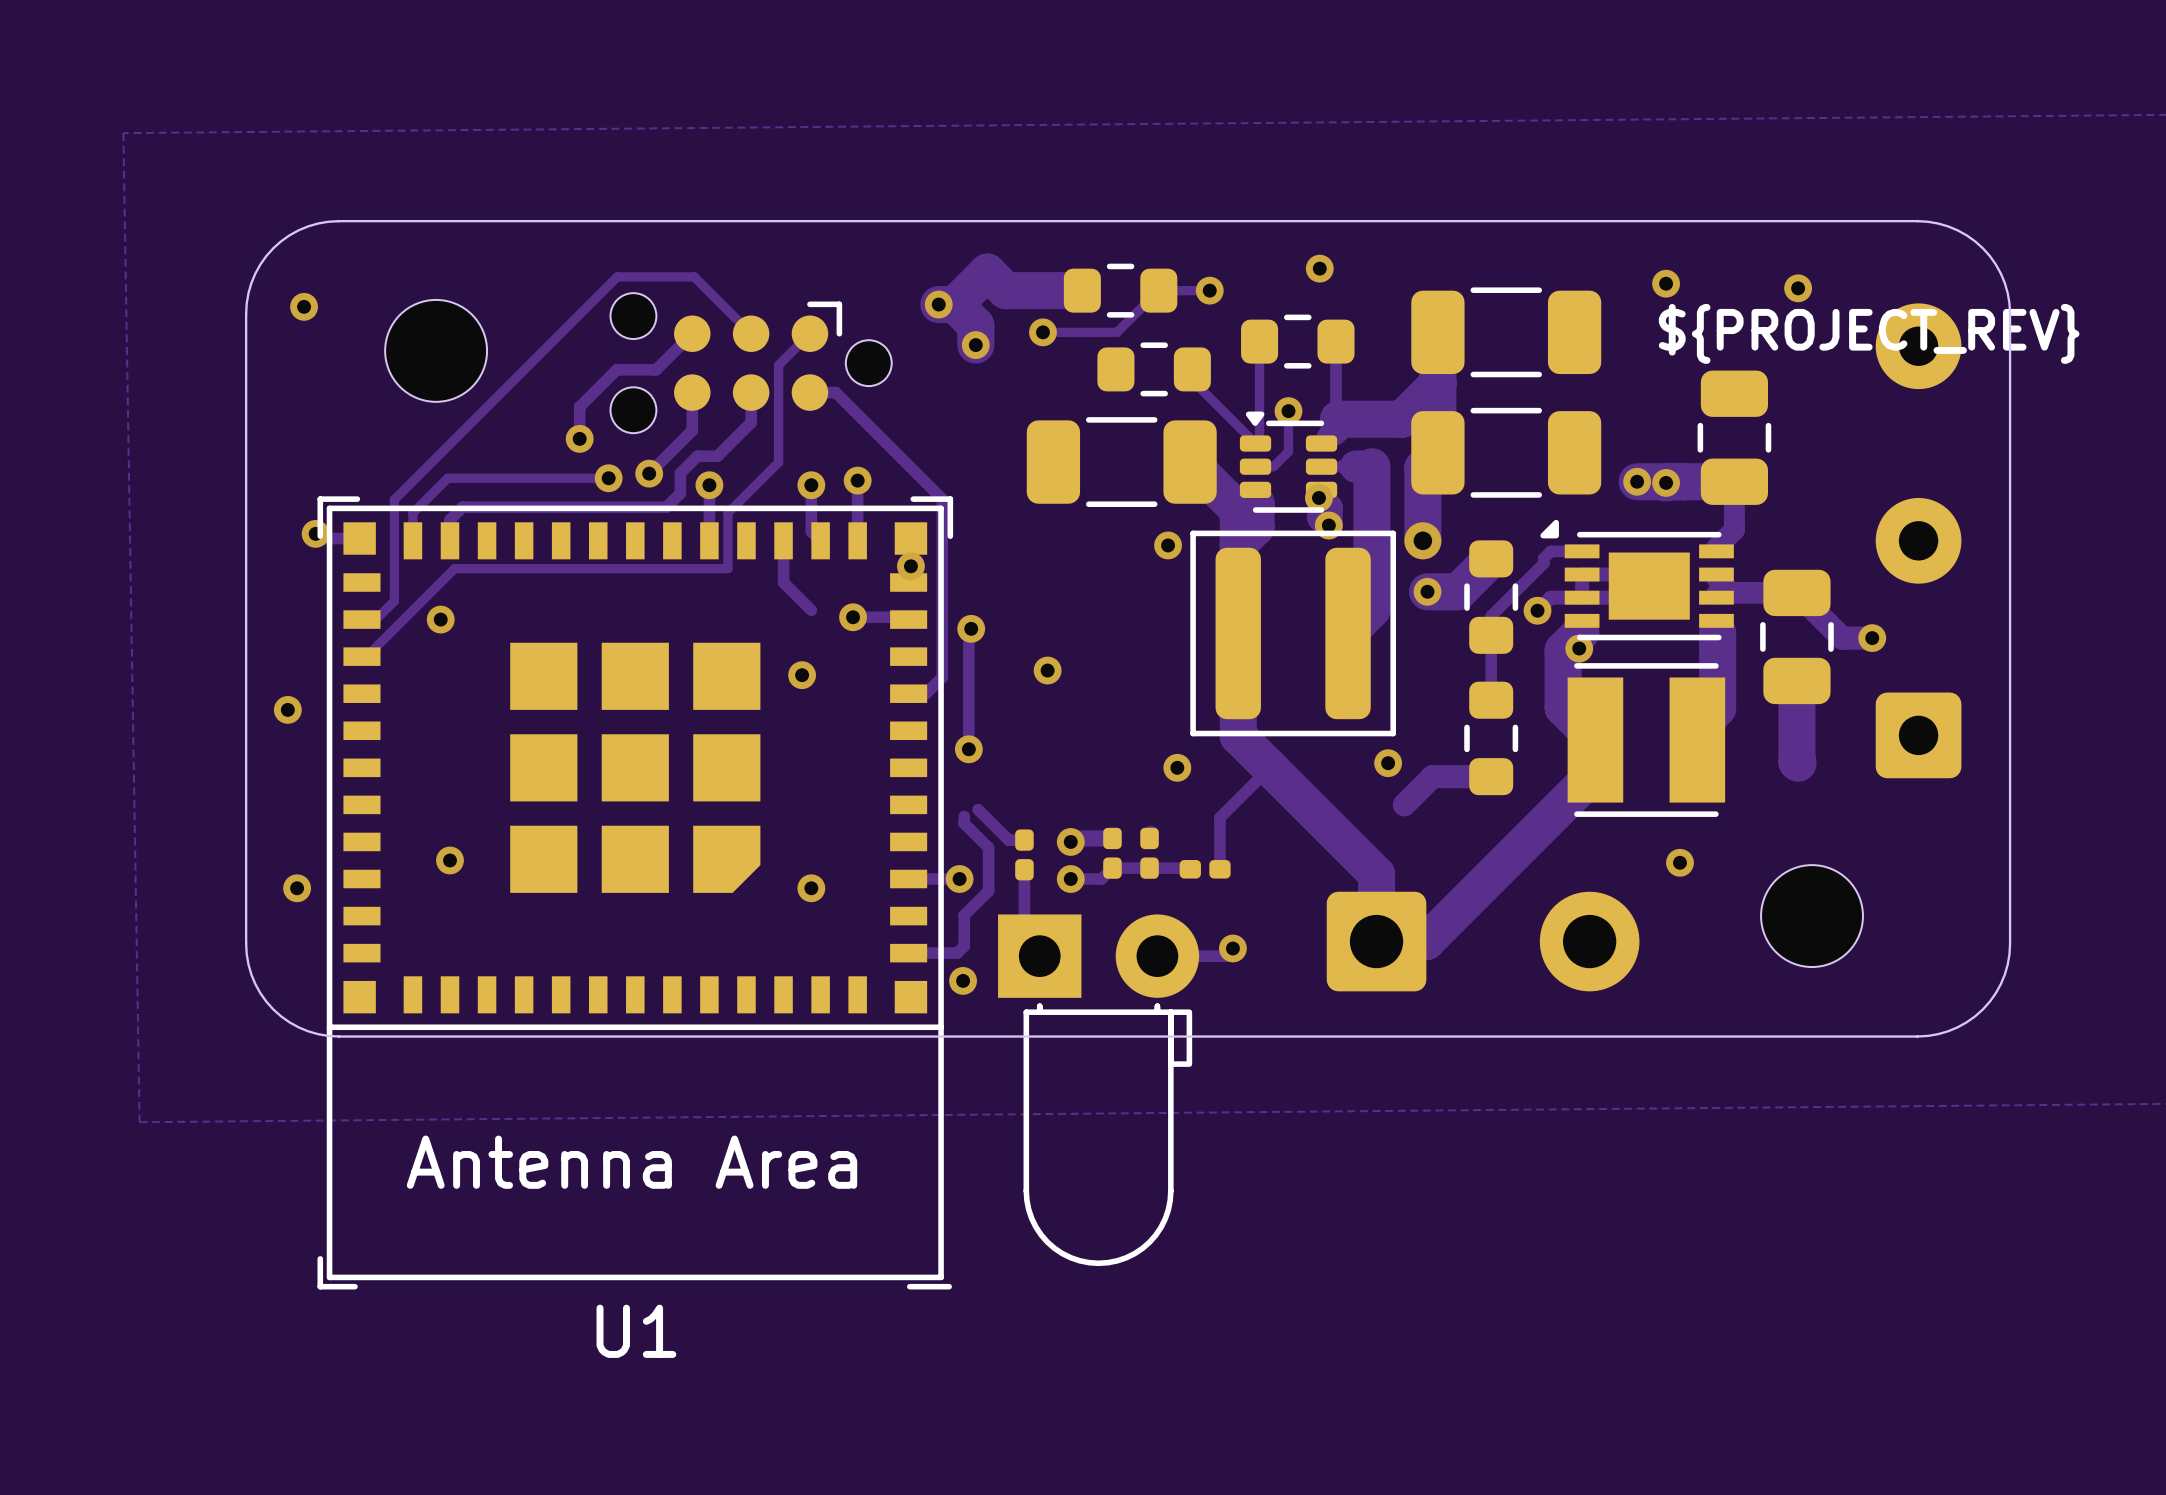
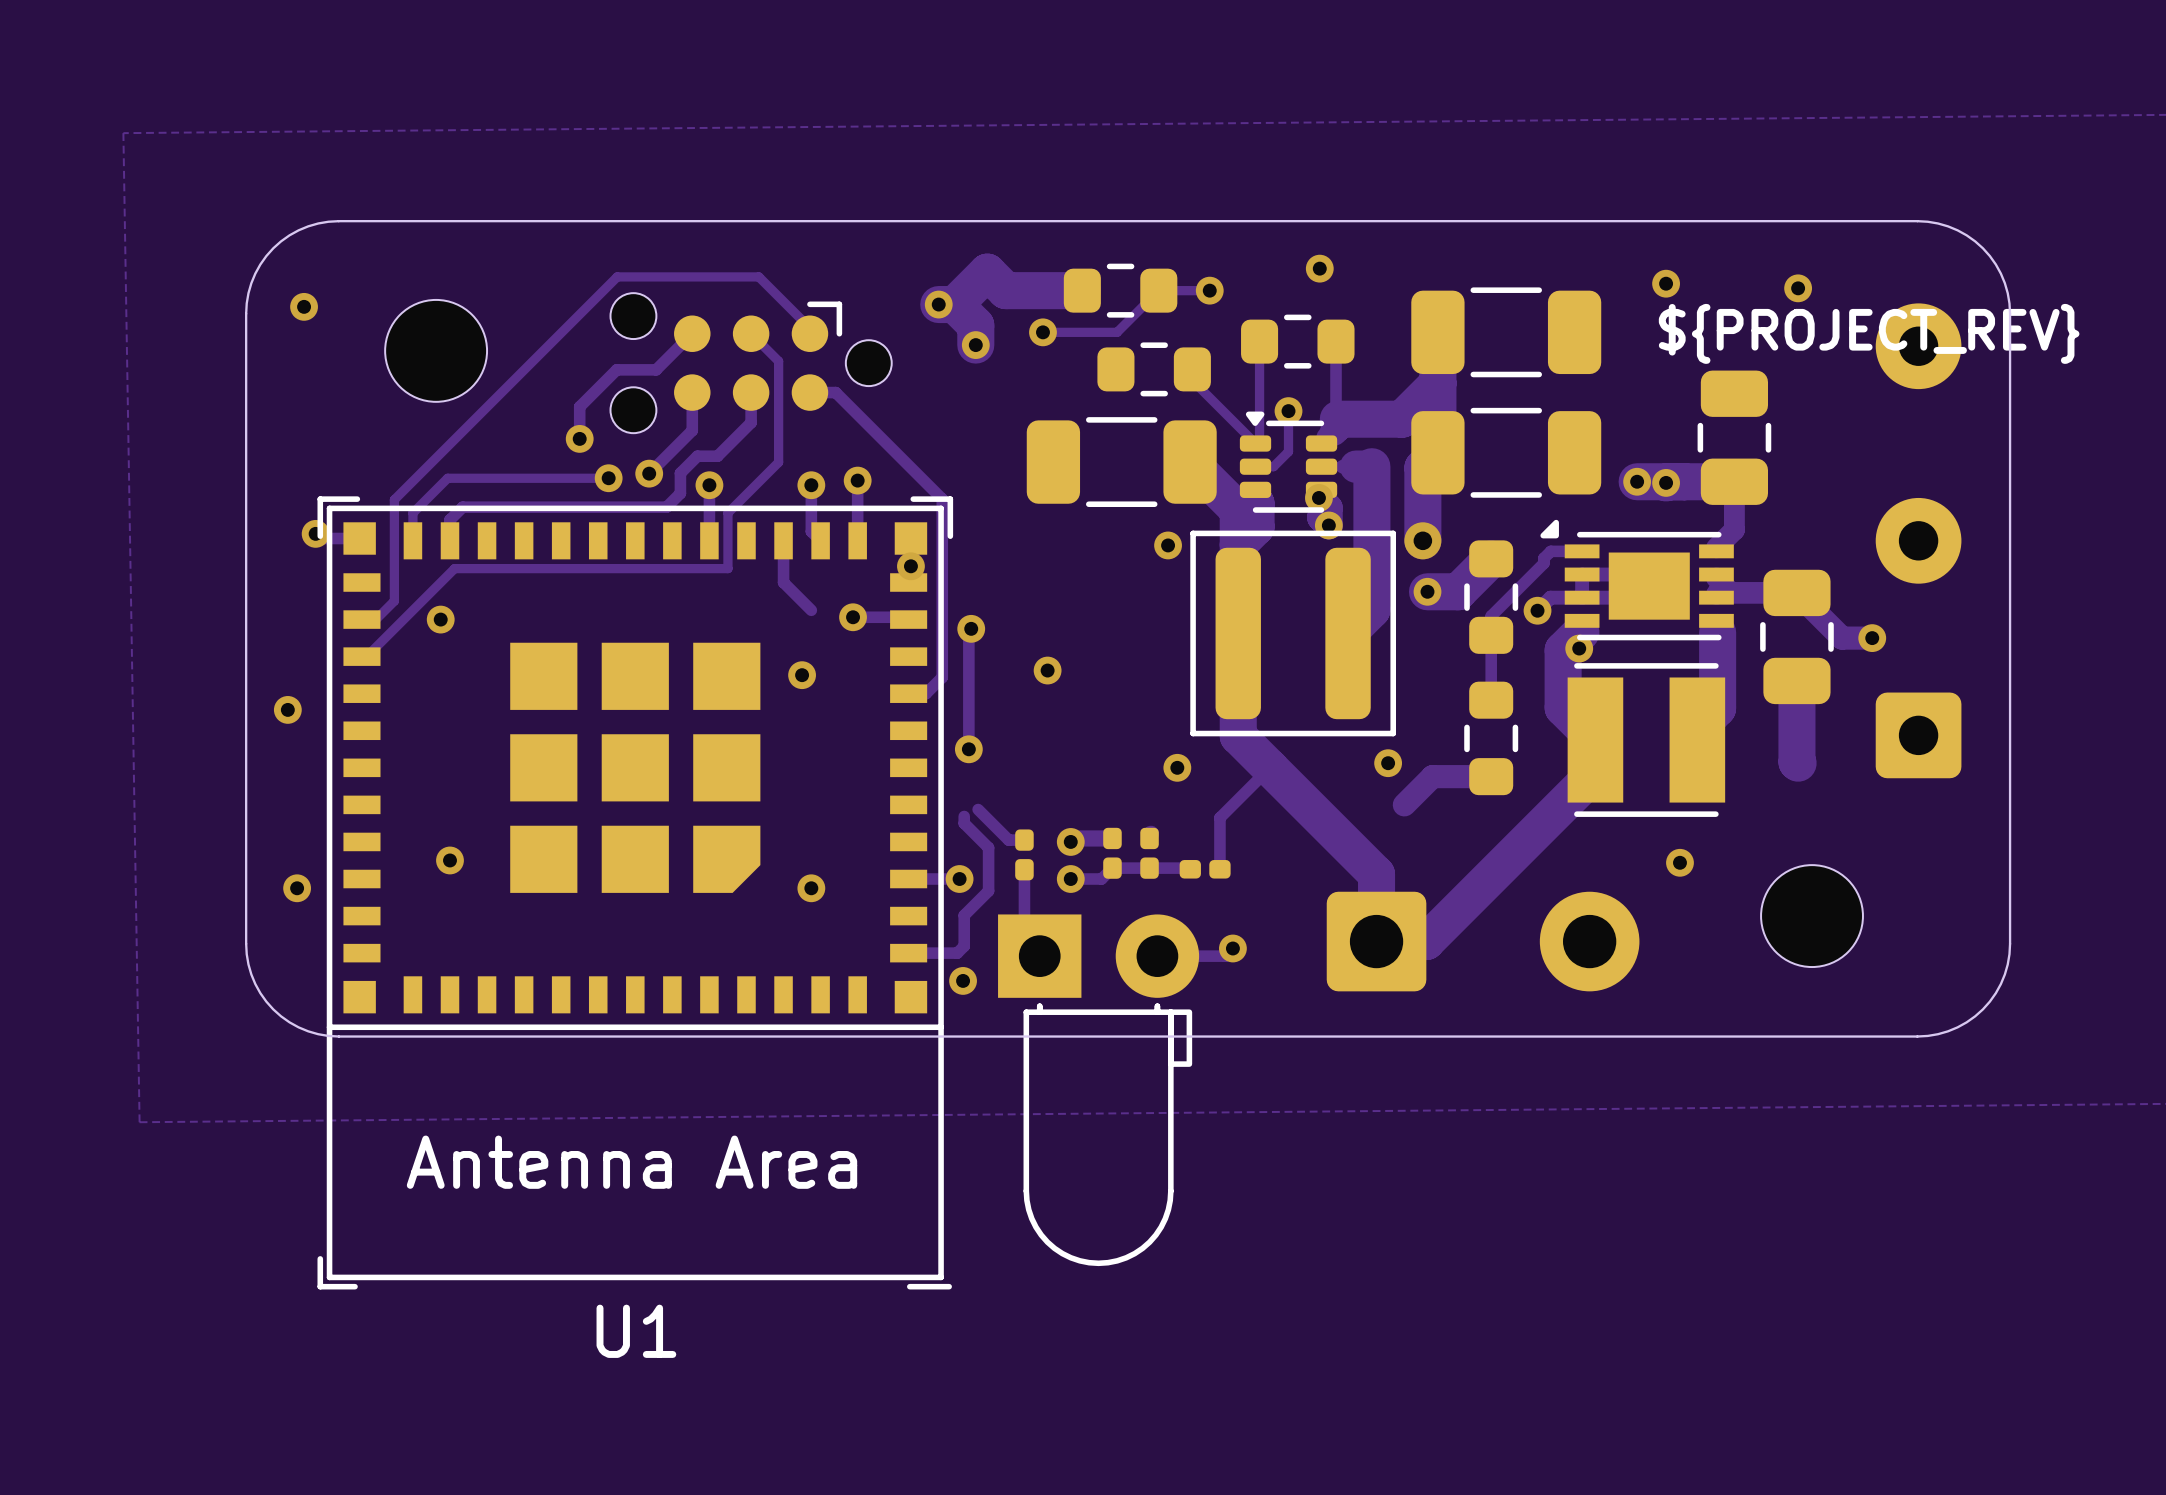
track: (694, 276) (751, 333) (746, 332) -> (694, 276) (758, 276) (809, 328) (809, 333)
track: (809, 333) (778, 365) -> (751, 333) (778, 361) (778, 365)

